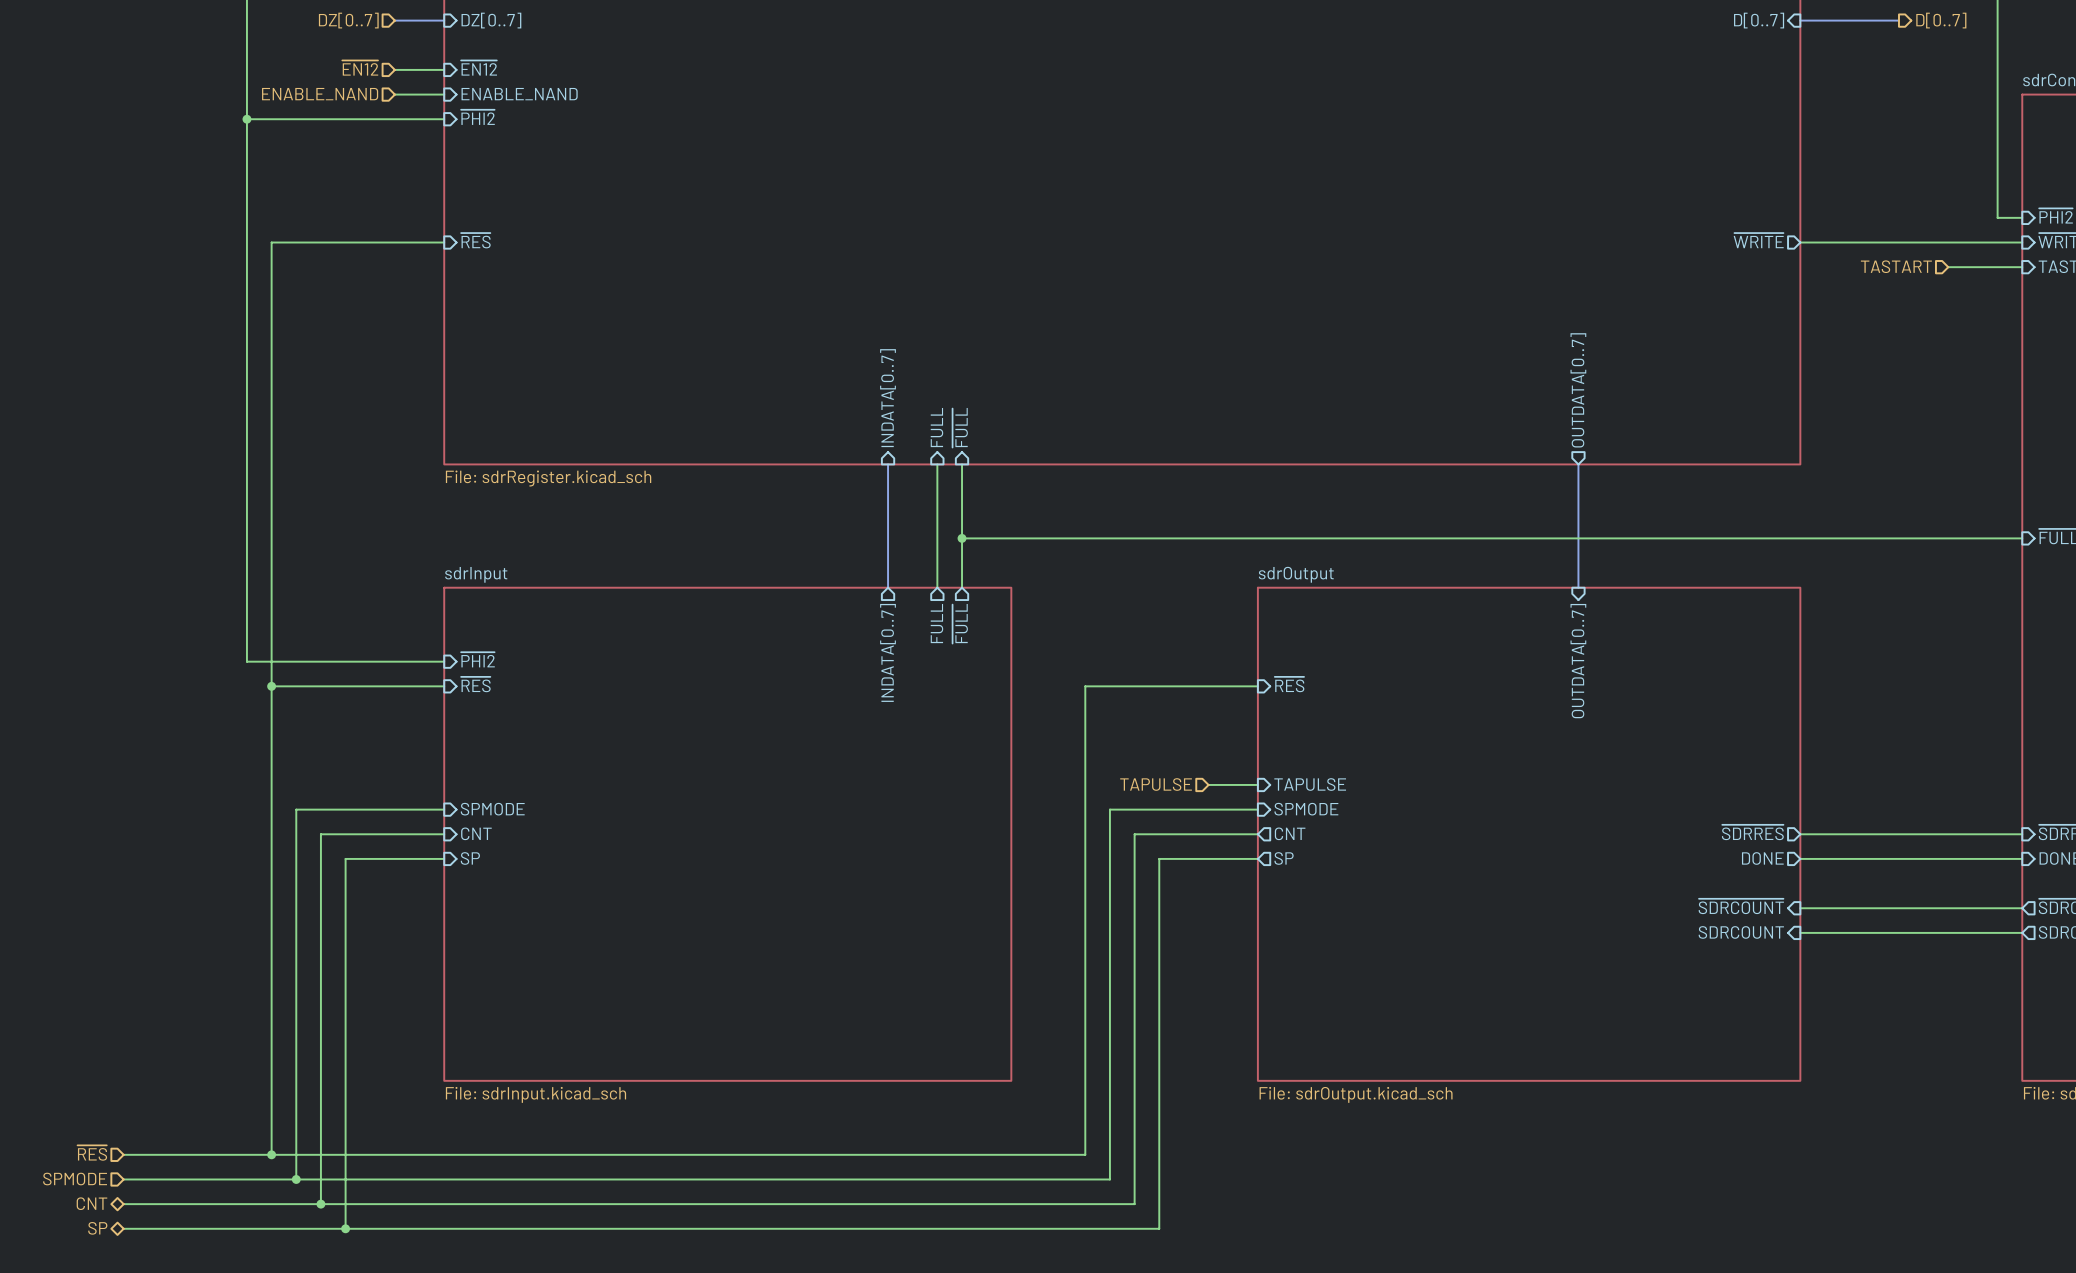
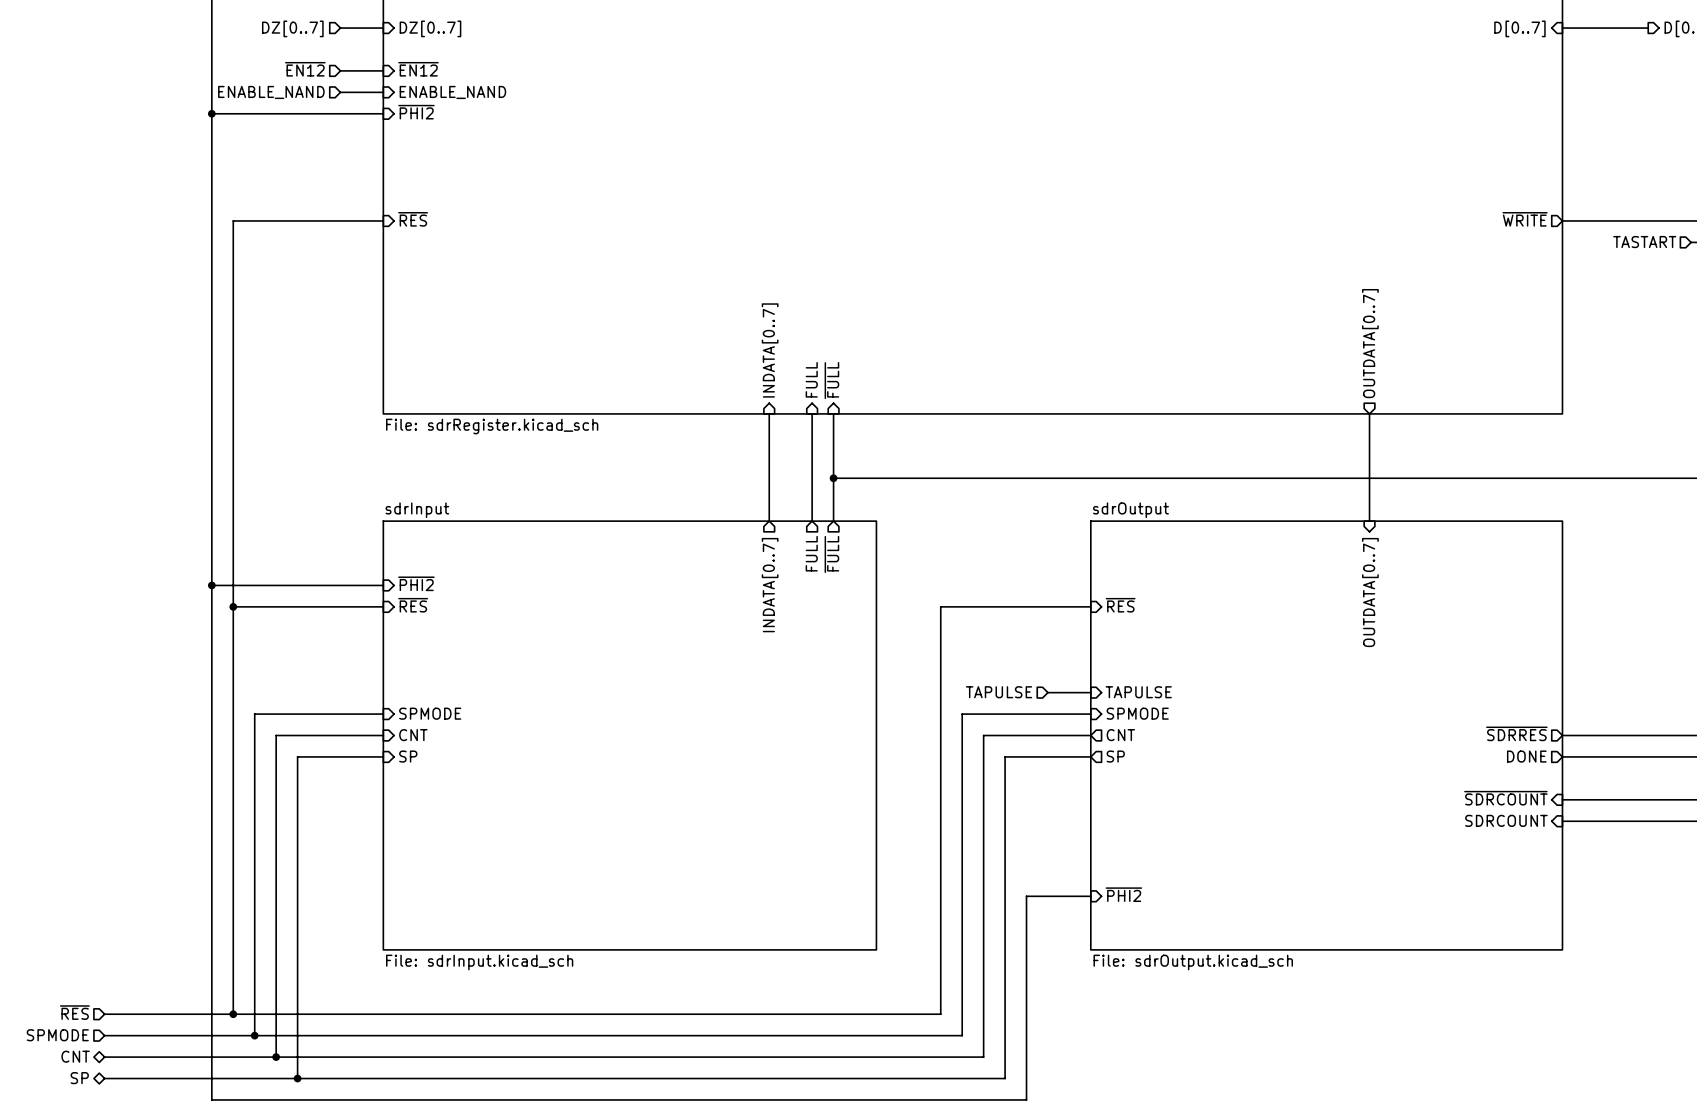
wire: none -> (211, 585) (211, 1099) (1026, 1099) (1026, 896) (1090, 896)
junction: none -> (211, 585)
sheet pin: none -> ~{PHI2} (1123, 894)

